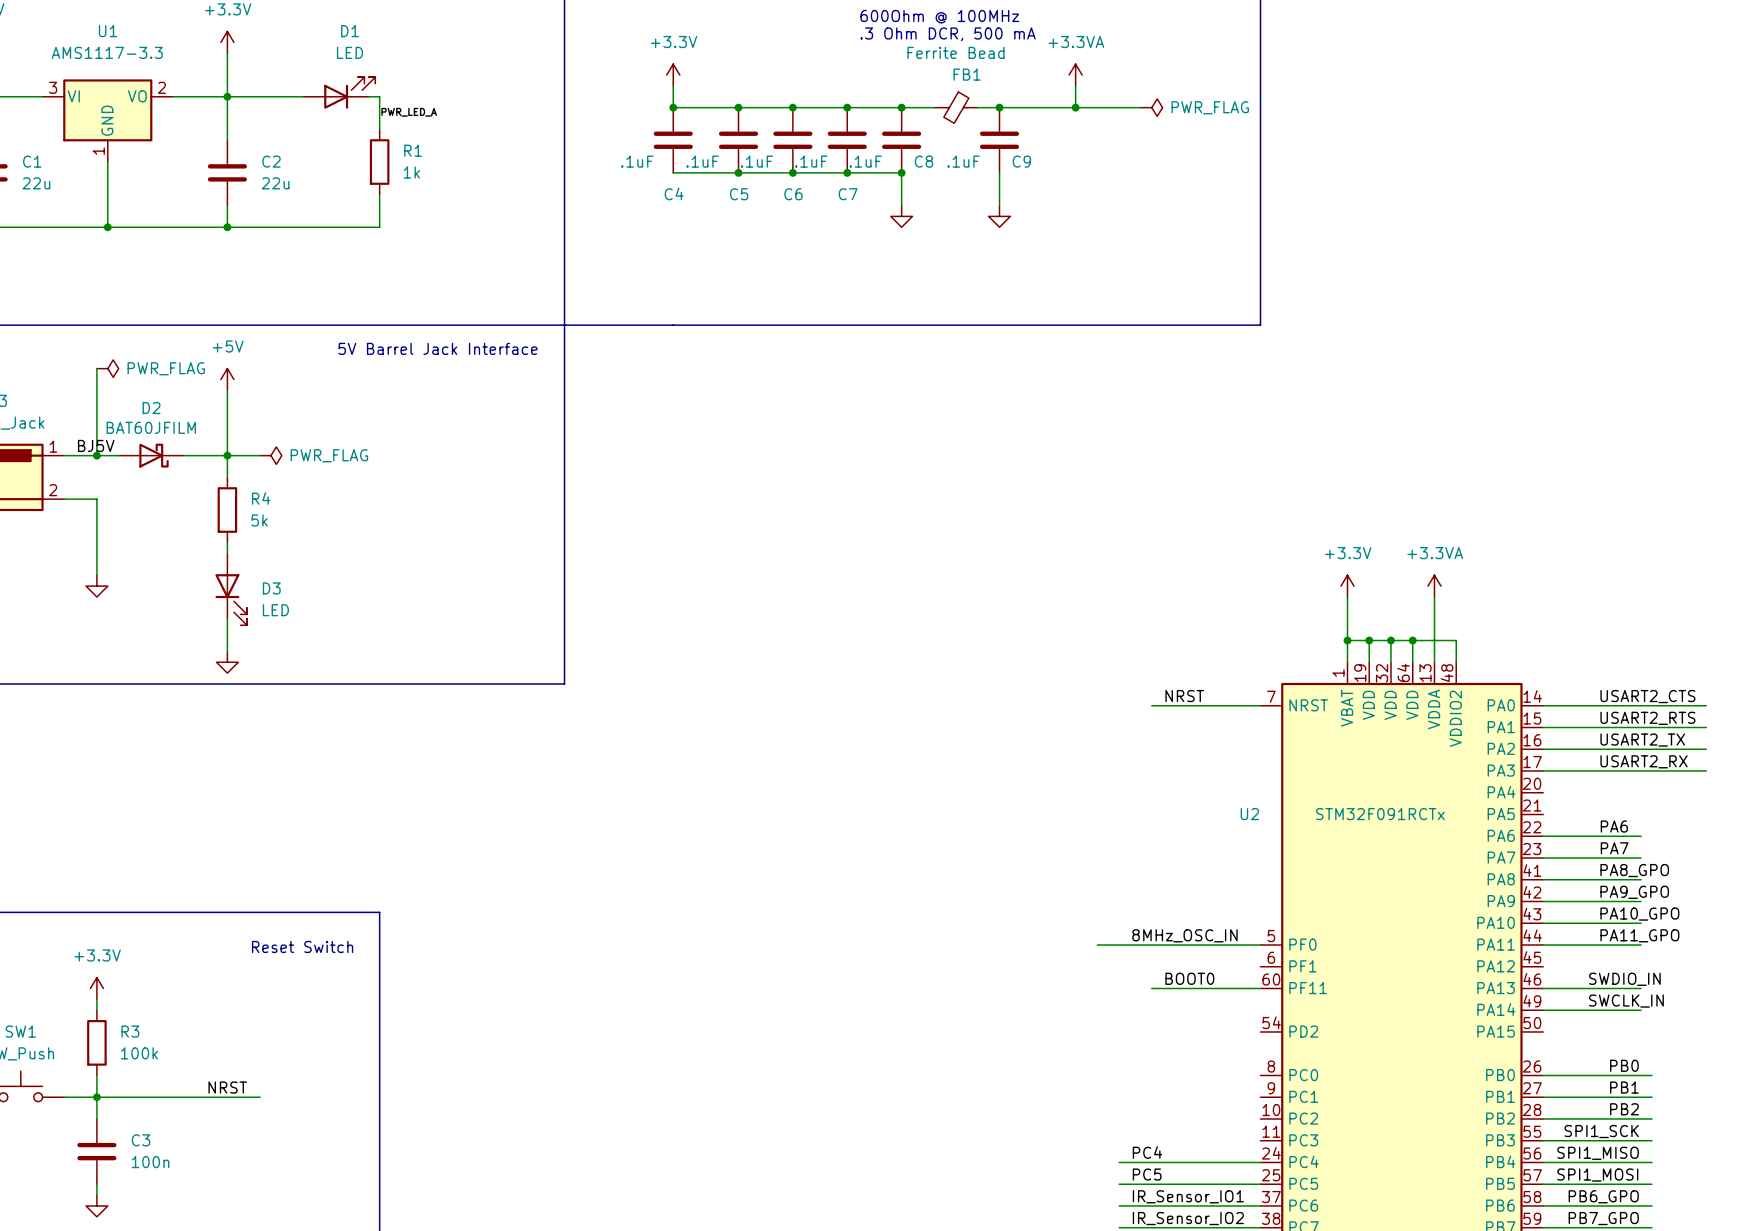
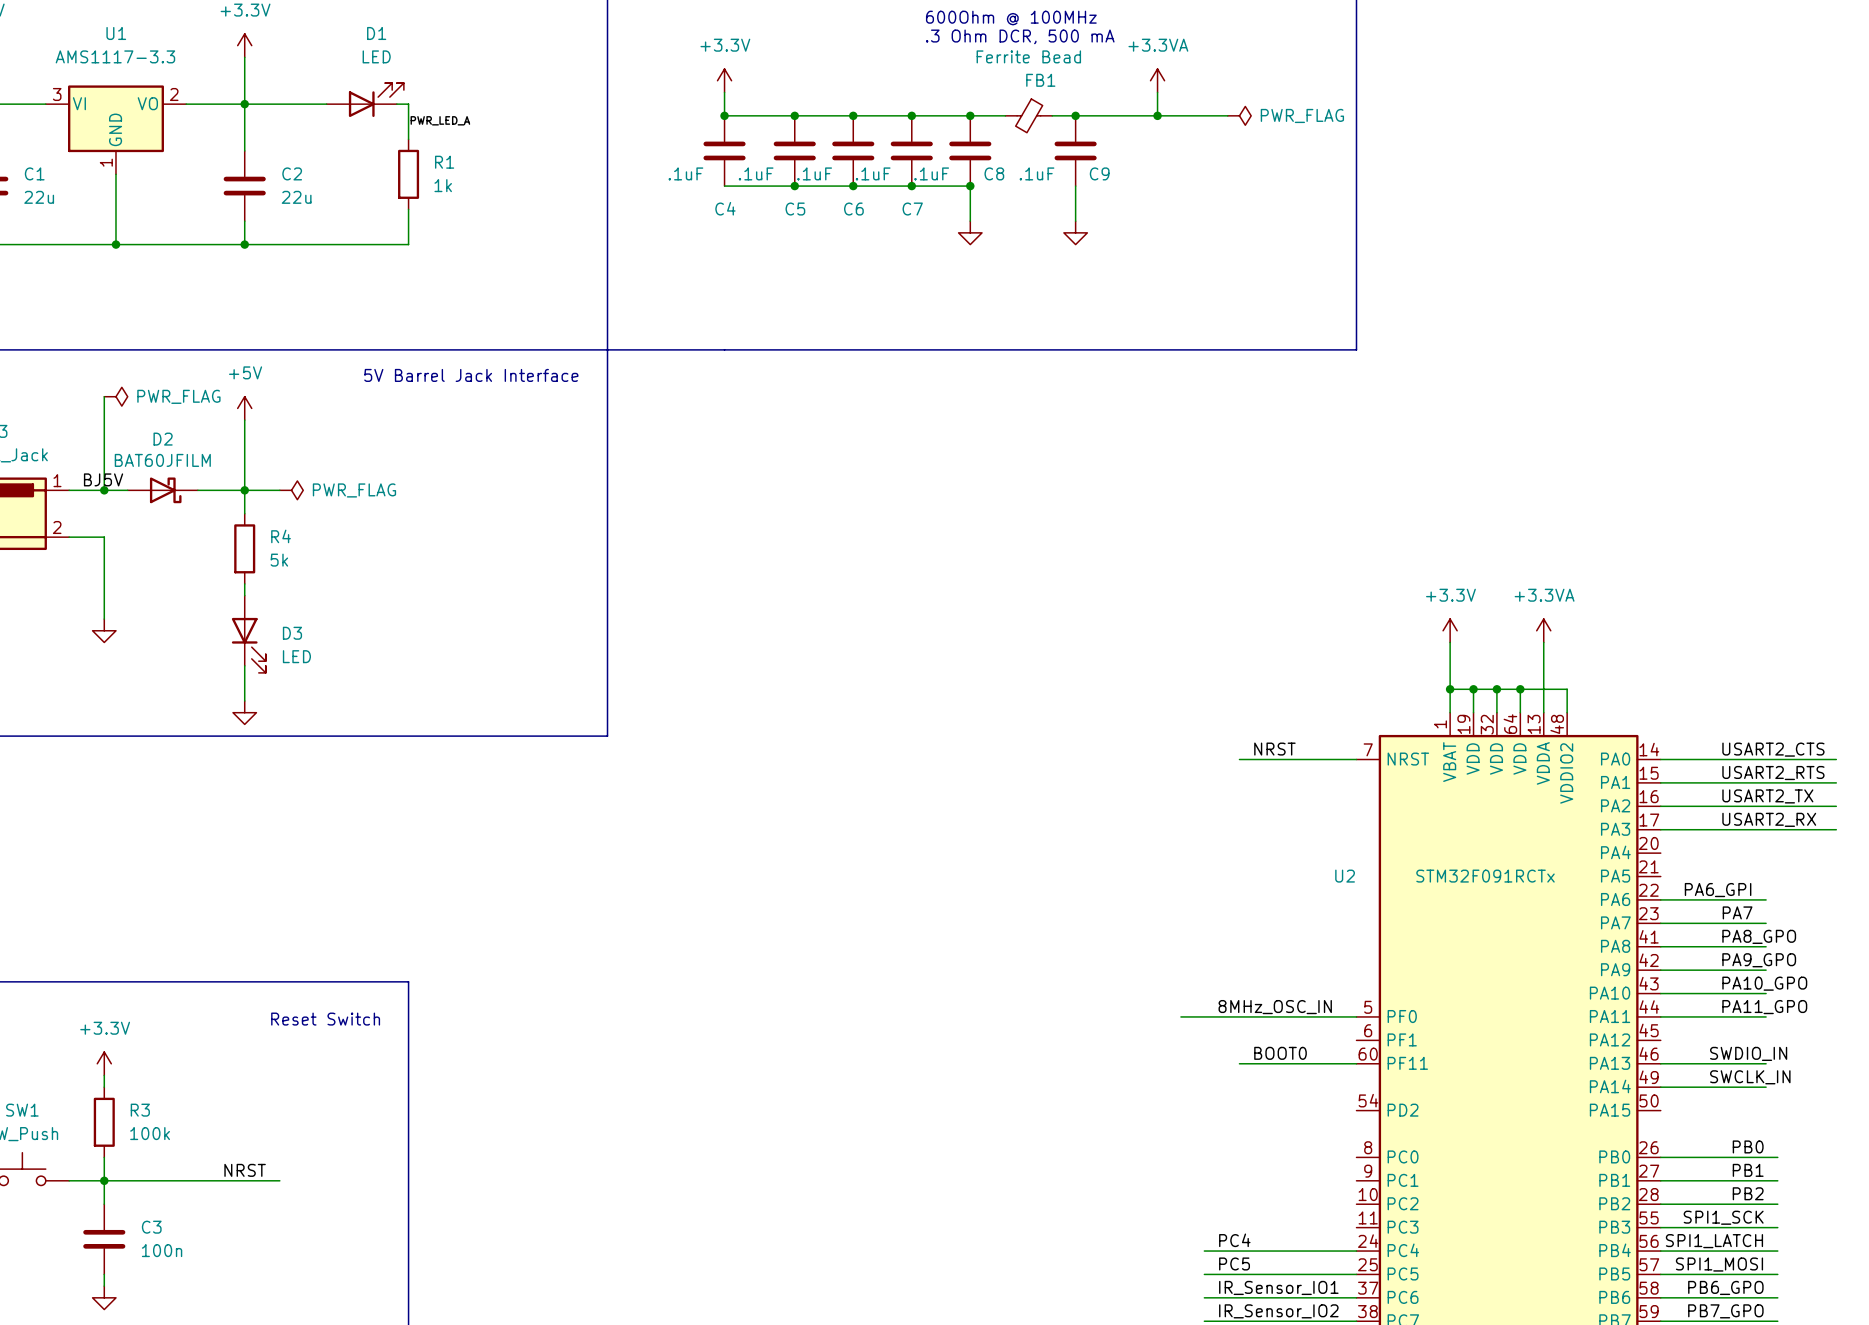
label: PA6 (1614, 826) -> PA6_GPI (1718, 890)
label: SPI1_MISO (1598, 1153) -> SPI1_LATCH (1714, 1241)

